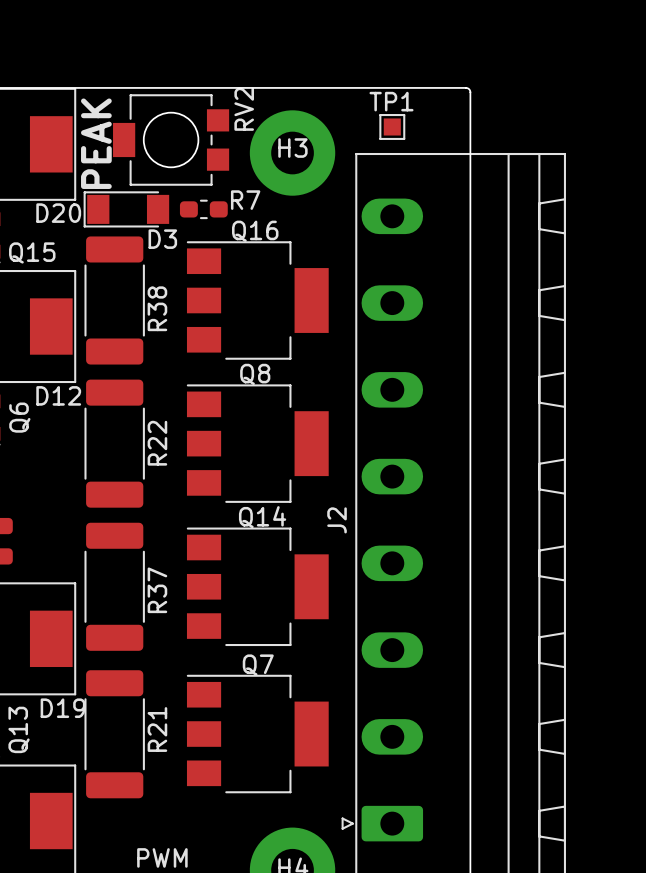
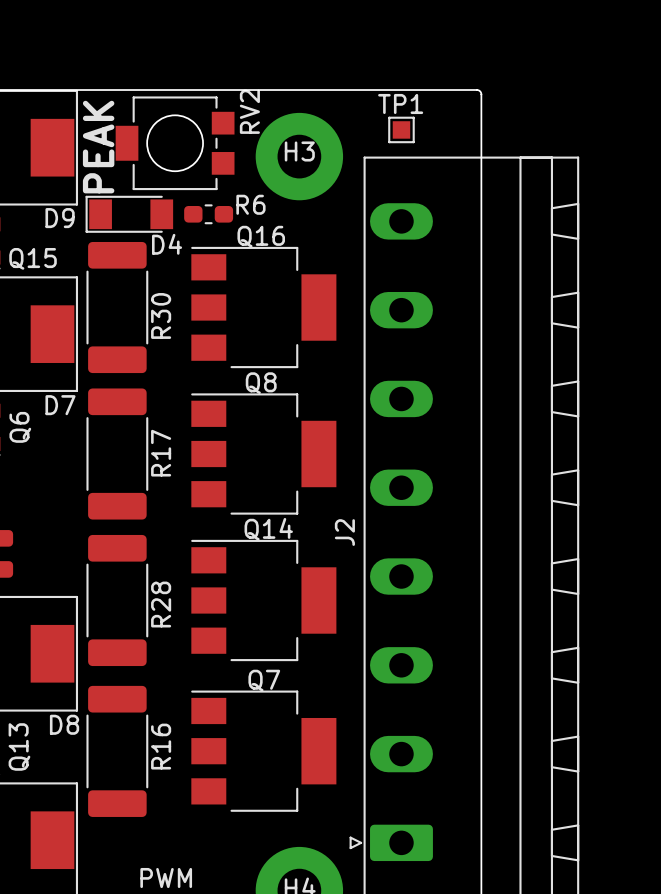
R7 name: R7 (245, 200) -> R6 (250, 204)
D20 name: D20 (58, 213) -> D9 (60, 218)
D3 name: D3 (162, 239) -> D4 (167, 244)
R38 name: R38 (157, 308) -> R30 (161, 315)
D12 name: D12 (58, 395) -> D7 (60, 405)
R22 name: R22 (157, 443) -> R17 (161, 453)
R37 name: R37 (157, 590) -> R28 (161, 604)
D19 name: D19 (63, 708) -> D8 (64, 724)
R21 name: R21 (157, 729) -> R16 (161, 746)

